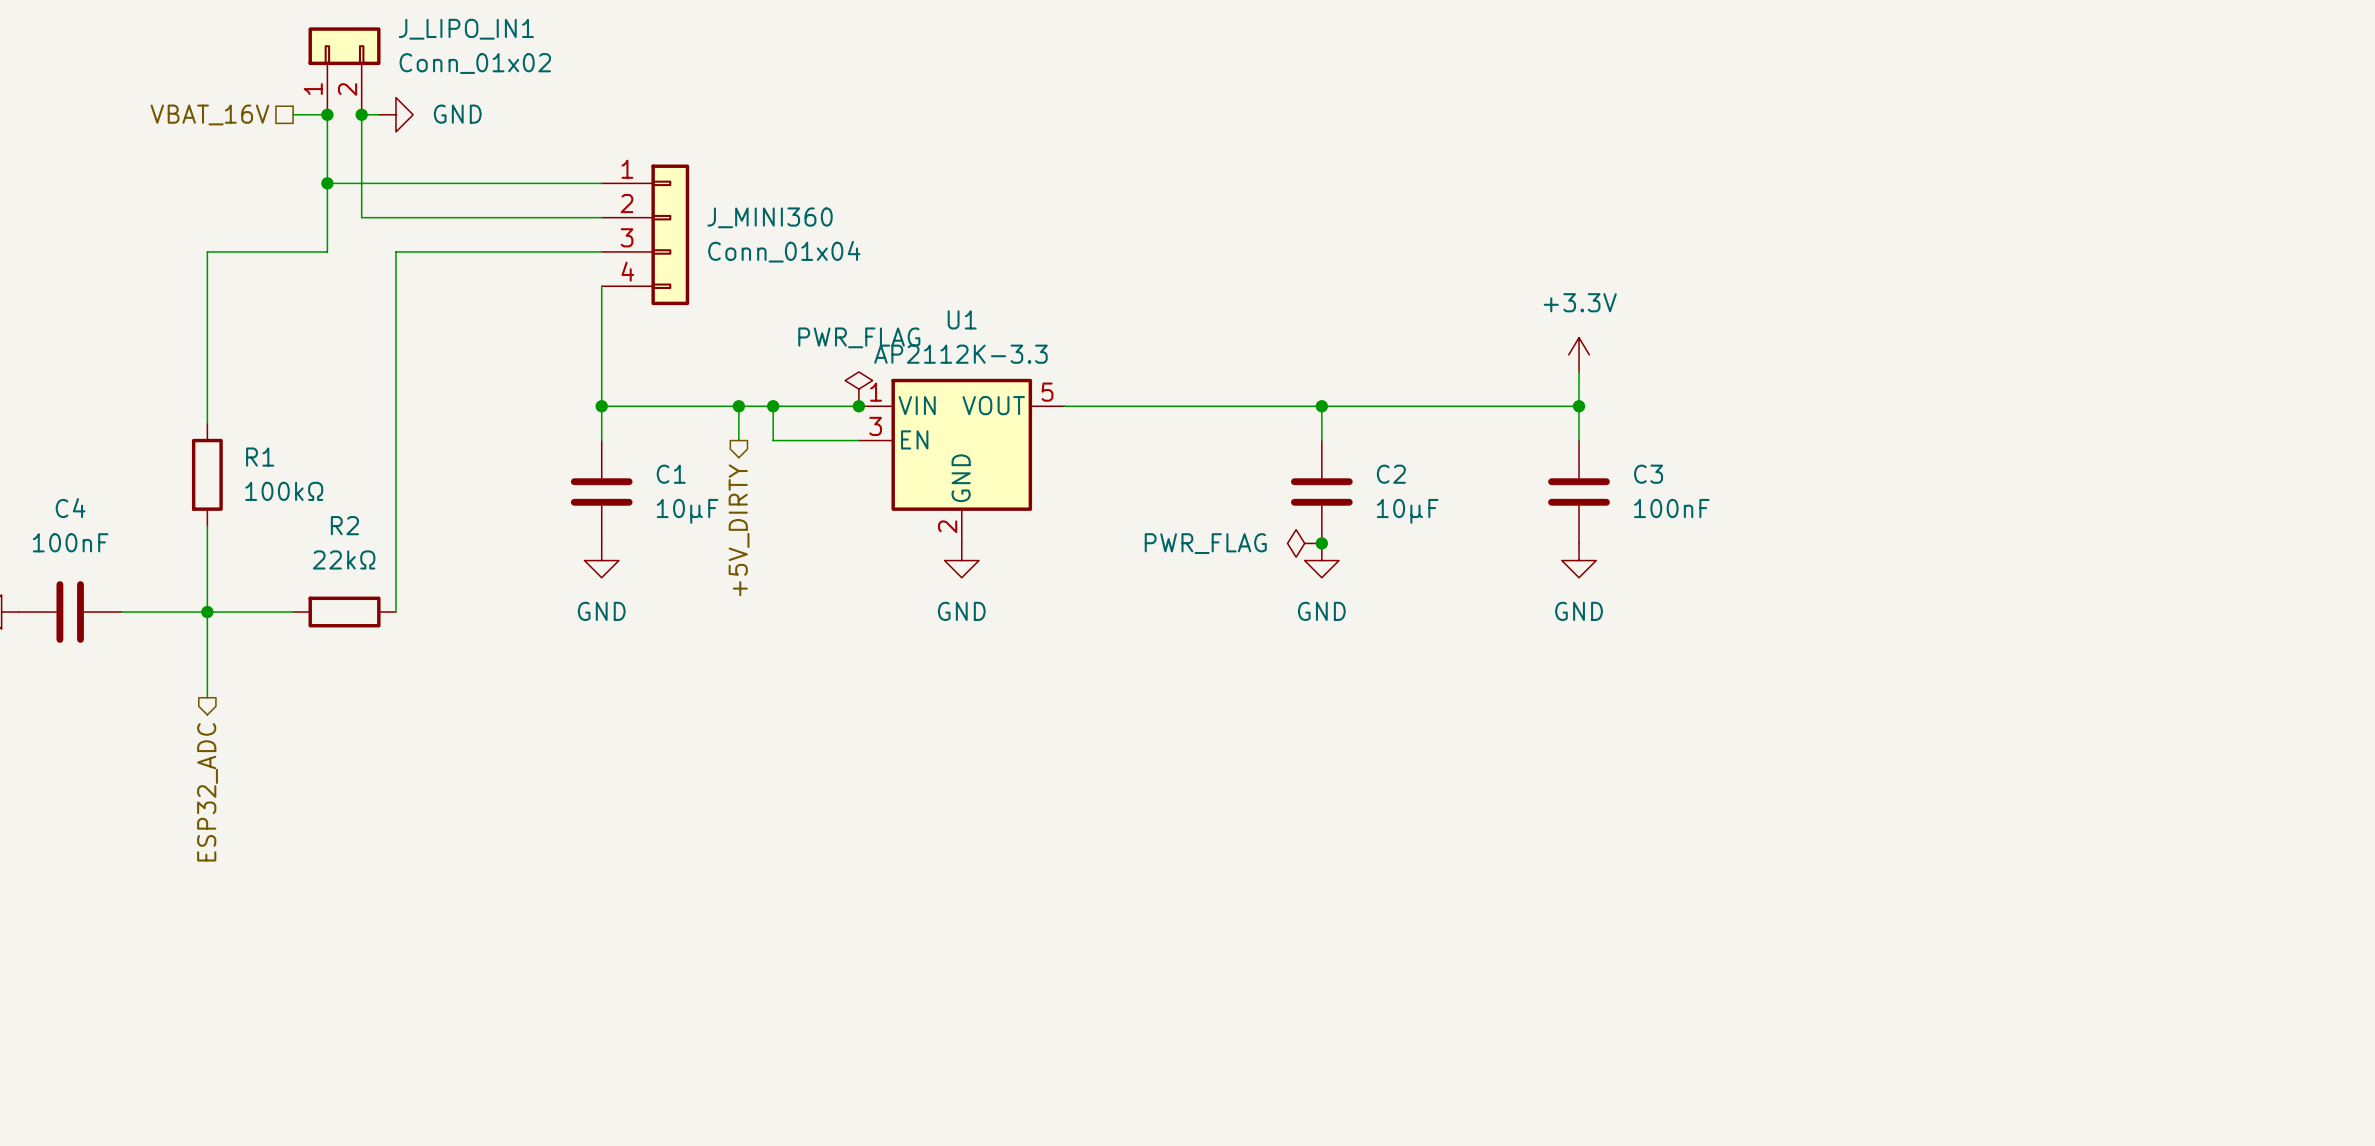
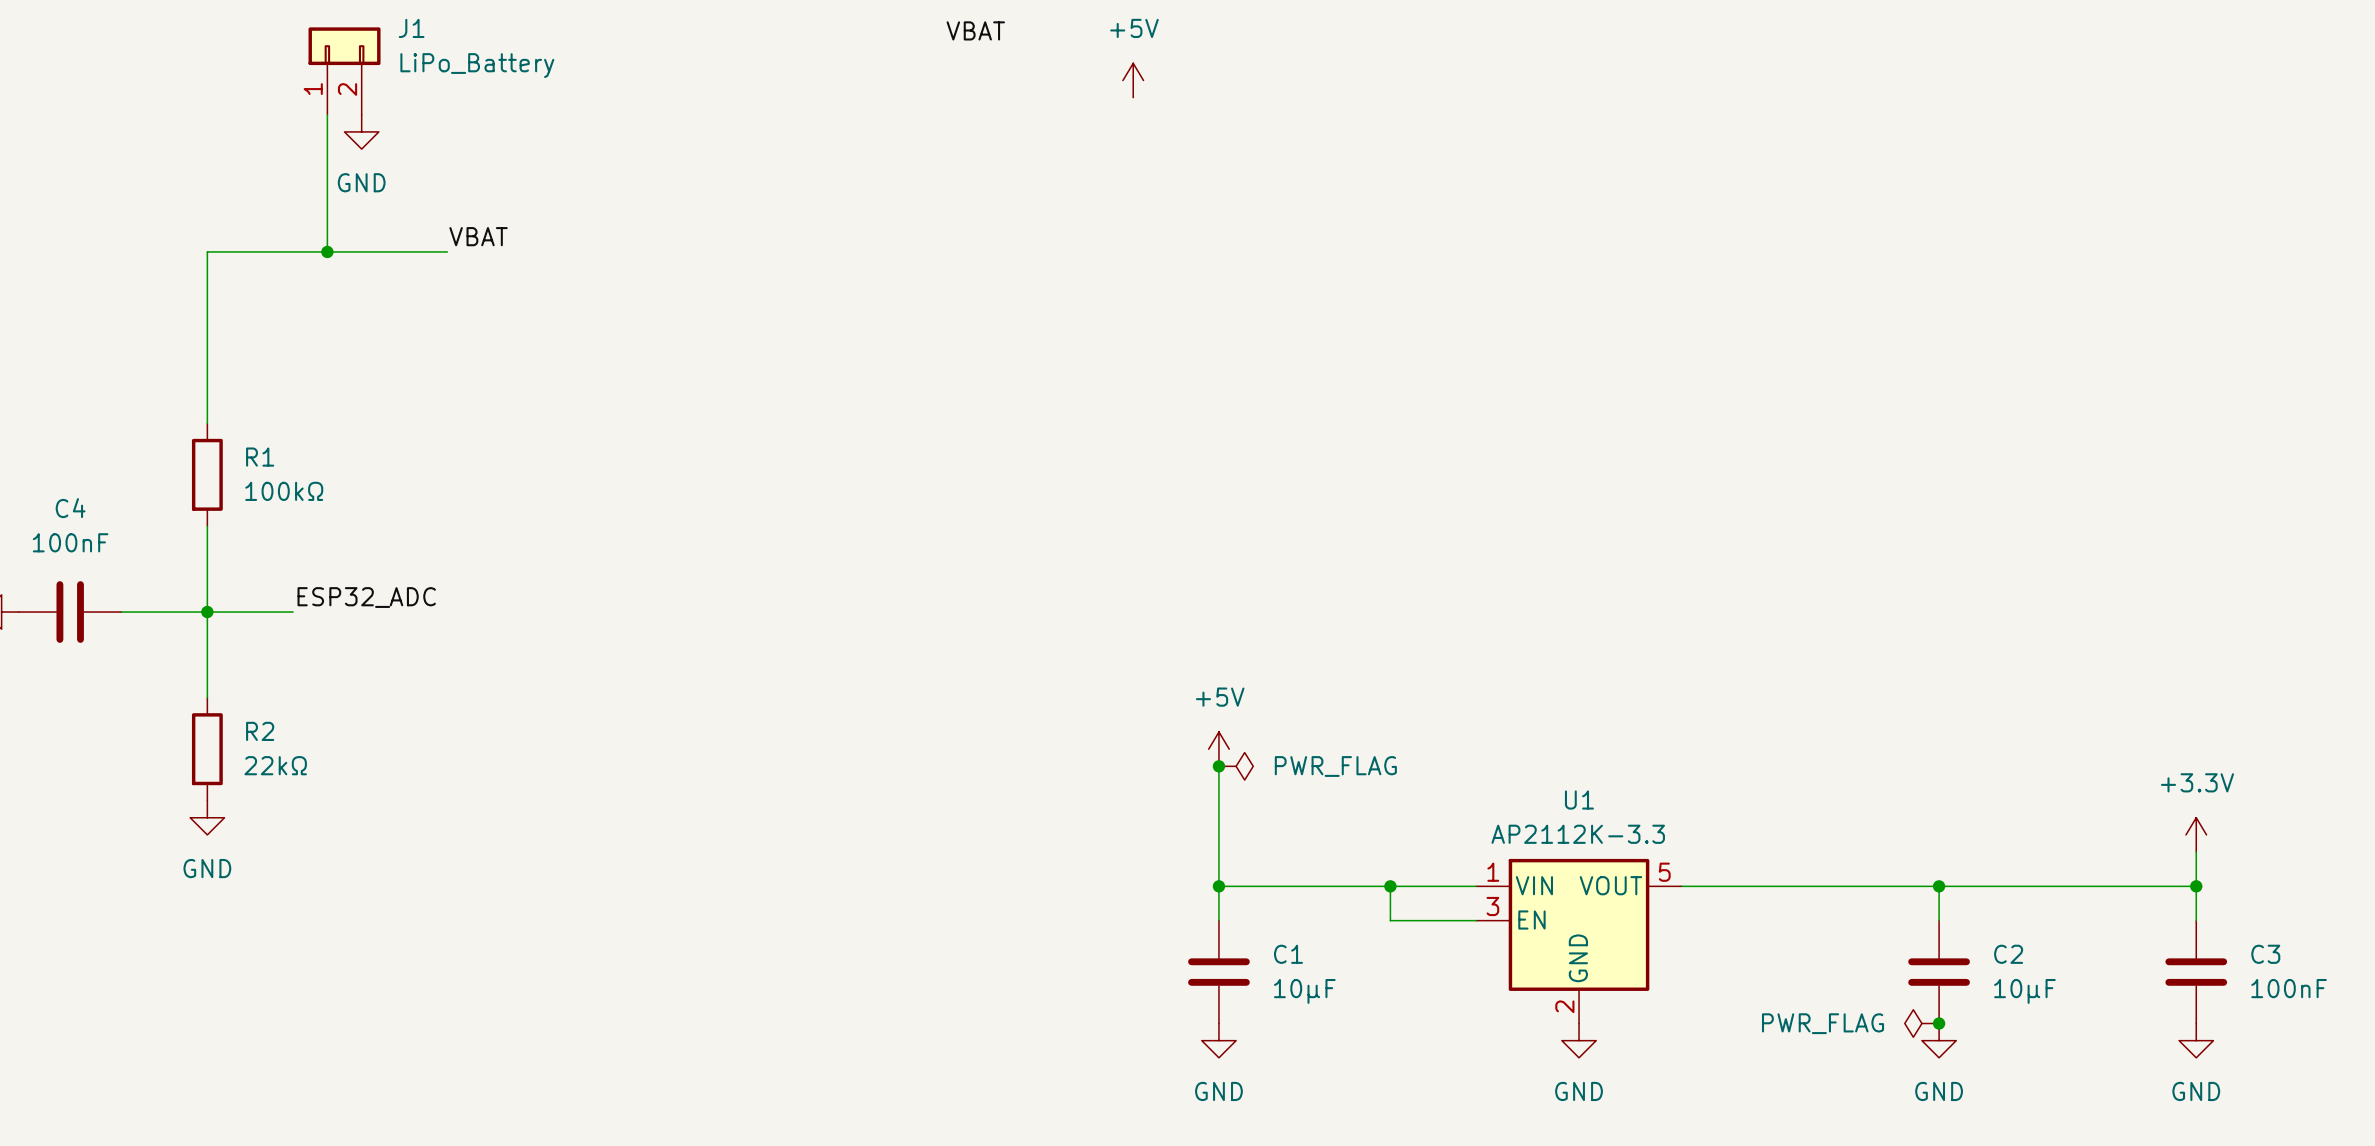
J_LIPO_IN1 name: J_LIPO_IN1 (466, 29) -> J1 (411, 28)
label: none -> VBAT (975, 30)
J_LIPO_IN1 value: Conn_01x02 (475, 63) -> LiPo_Battery (477, 65)
power symbol: none -> +5V (1133, 80)
hierarchical label: VBAT_16V (209, 114) -> none
wire: (293, 114) (327, 114) -> none
junction: (327, 114) -> none
junction: (361, 114) -> none
wire: (378, 114) (361, 114) (361, 217) (601, 217) -> none
power symbol rotation: 0° (395, 114) -> 90° clockwise (361, 131)
power symbol position: GND (395, 114) -> GND (361, 131)
wire: (327, 183) (601, 183) -> none
junction: (327, 183) -> none
J_MINI360: Conn_01x04 (645, 234) -> none
label: none -> VBAT (478, 236)
junction: none -> (327, 251)
wire: (395, 251) (395, 612) -> (395, 251) (327, 251)
wire: (447, 251) (601, 251) -> none
wire: (601, 286) (601, 440) -> none
power symbol: +3.3V (1579, 354) -> none
wire: (1579, 371) (1579, 440) -> none
power symbol: PWR_FLAG (858, 389) -> none
wire: (601, 406) (858, 406) -> none
junction: (601, 406) -> none
wire: (738, 406) (738, 440) -> none
junction: (738, 406) -> none
wire: (773, 406) (773, 440) (858, 440) -> none
junction: (773, 406) -> none
junction: (858, 406) -> none
wire: (1064, 406) (1579, 406) -> none
wire: (1321, 406) (1321, 440) -> none
junction: (1321, 406) -> none
junction: (1579, 406) -> none
U1 position: (961, 461) -> (1579, 941)
C1 position: (601, 492) -> (1218, 972)
C2 position: (1321, 492) -> (1939, 972)
C3 position: (1579, 492) -> (2196, 972)
R2 name position: R2 (344, 525) -> R2 (260, 731)
hierarchical label: +5V_DIRTY (739, 530) -> none
power symbol rotation: 0° (1304, 543) -> 180° (1236, 766)
power symbol position: PWR_FLAG (1304, 543) -> PWR_FLAG (1236, 766)
junction: (1321, 543) -> none
R2 value position: 22kΩ (344, 559) -> 22kΩ (275, 765)
power symbol: GND (601, 560) -> none
power symbol: GND (961, 560) -> none
power symbol: GND (1321, 560) -> none
power symbol: GND (1579, 560) -> none
label: none -> ESP32_ADC (366, 597)
R2 rotation: 0° (344, 612) -> 90° clockwise (207, 749)
R2 position: (344, 612) -> (207, 749)
power symbol: none -> +5V (1218, 749)
wire: none -> (1218, 766) (1218, 920)
junction: none -> (1218, 766)
hierarchical label: ESP32_ADC (207, 792) -> none
power symbol: none -> GND (207, 817)
power symbol: none -> +3.3V (2196, 834)
wire: none -> (2196, 852) (2196, 920)
wire: none -> (1218, 886) (1476, 886)
junction: none -> (1218, 886)
wire: none -> (1390, 886) (1390, 920) (1476, 920)
junction: none -> (1390, 886)
wire: none -> (1681, 886) (2196, 886)
wire: none -> (1939, 886) (1939, 920)
junction: none -> (1939, 886)
junction: none -> (2196, 886)
power symbol: none -> PWR_FLAG (1921, 1023)
junction: none -> (1939, 1023)
power symbol: none -> GND (1218, 1040)
power symbol: none -> GND (1579, 1040)
power symbol: none -> GND (1939, 1040)
power symbol: none -> GND (2196, 1040)

